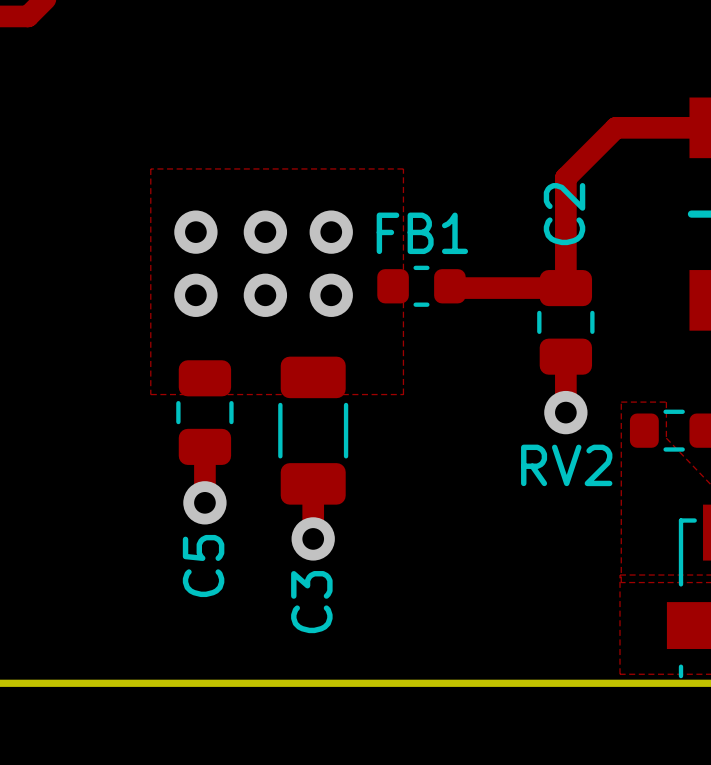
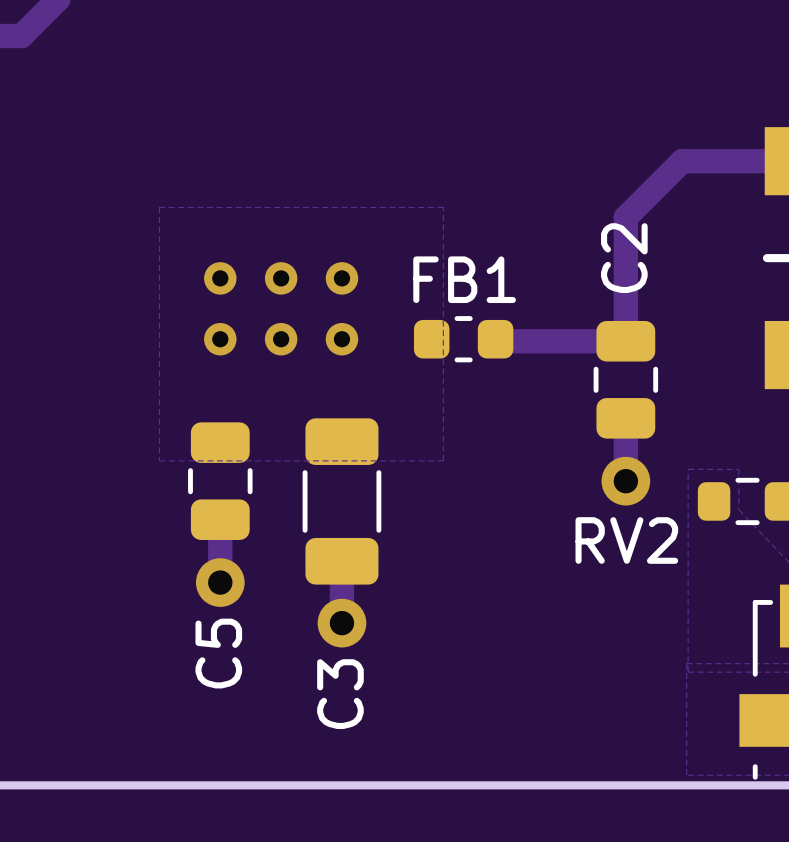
via size: [174, 210, 218, 254] -> [204, 262, 237, 295]
via size: [243, 210, 288, 254] -> [264, 262, 298, 295]
via size: [309, 210, 353, 254] -> [325, 262, 359, 295]
via size: [174, 273, 218, 317] -> [204, 323, 237, 356]
via size: [243, 273, 288, 317] -> [264, 323, 298, 356]
via size: [309, 273, 353, 317] -> [325, 323, 359, 356]

